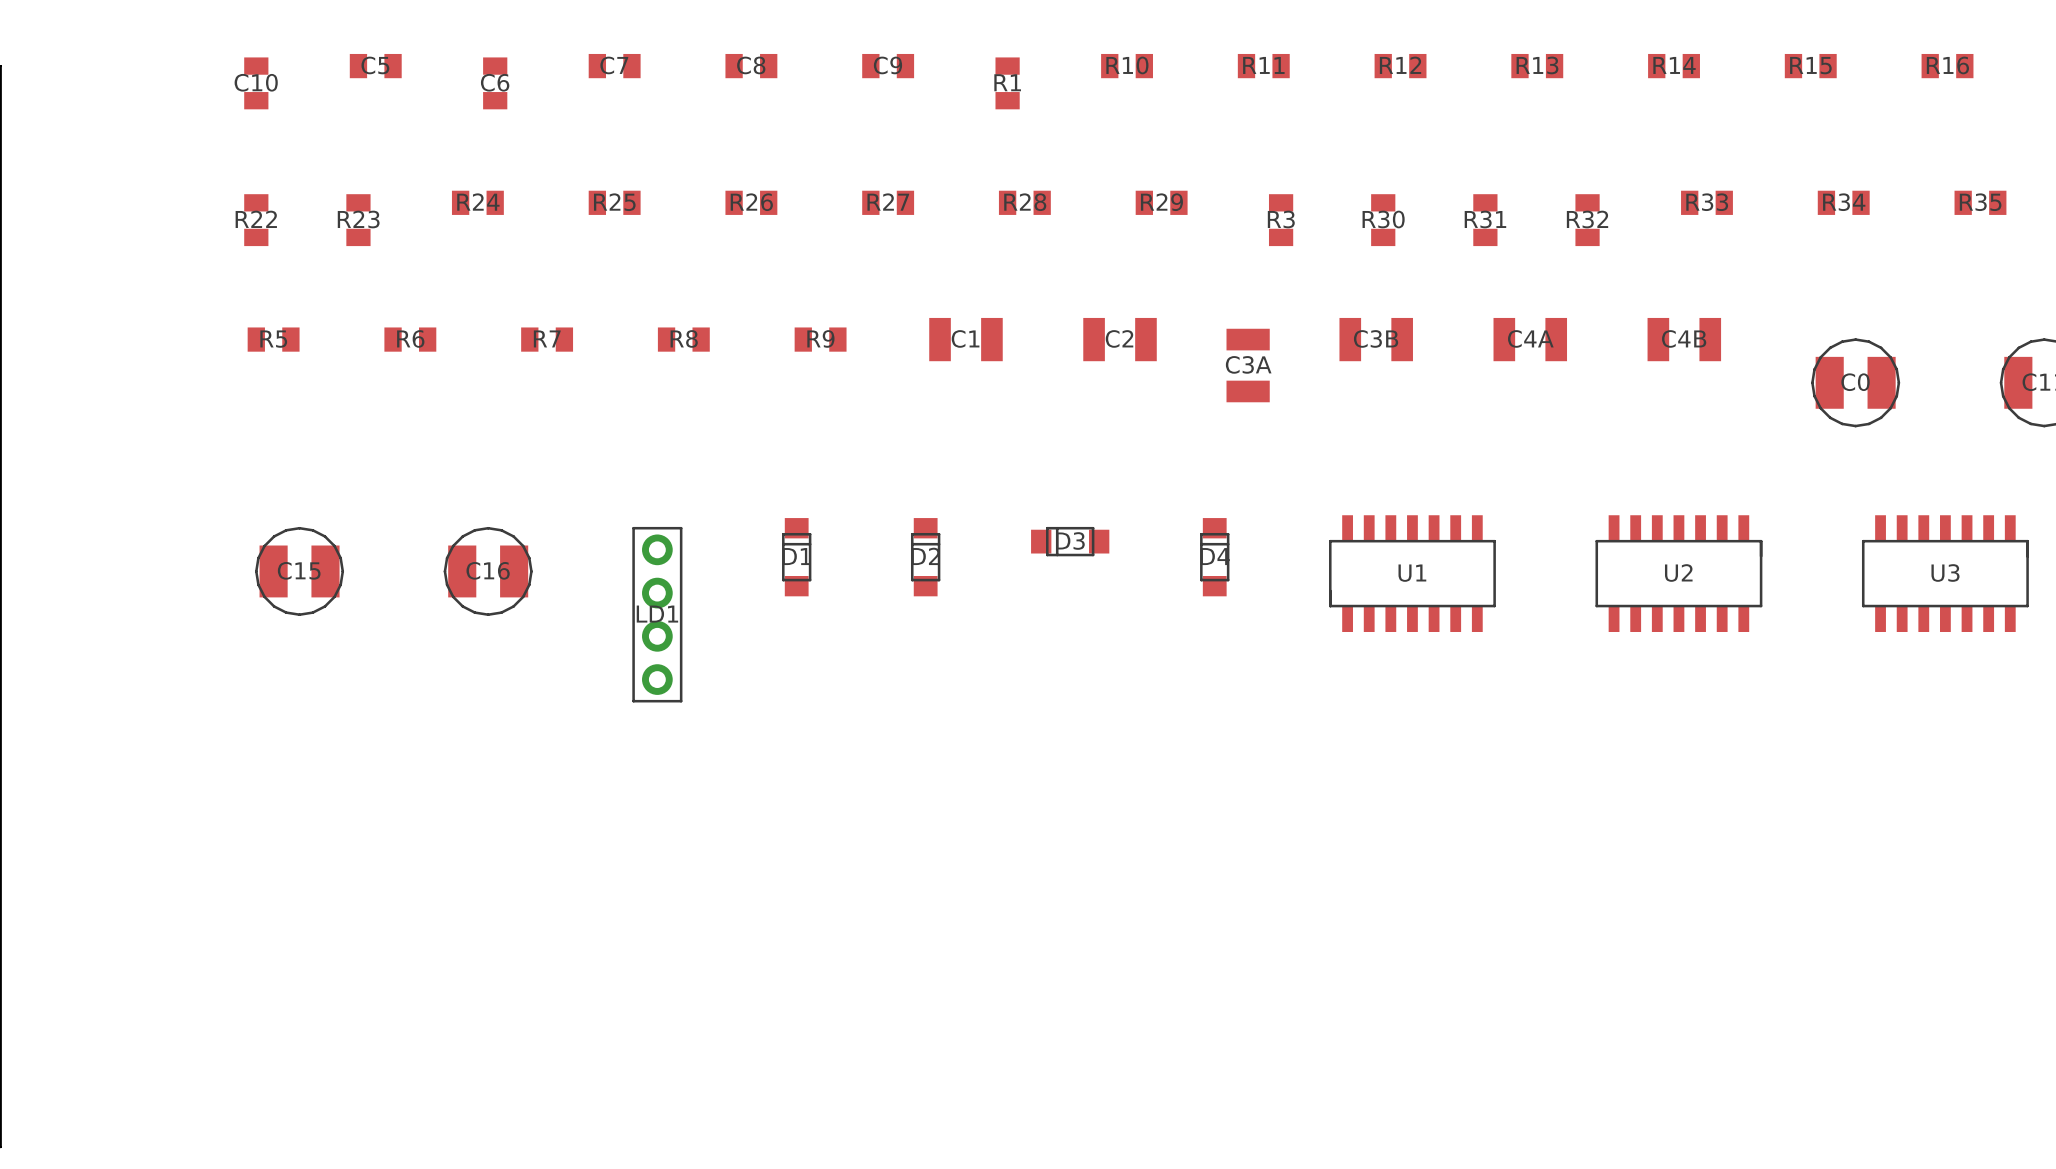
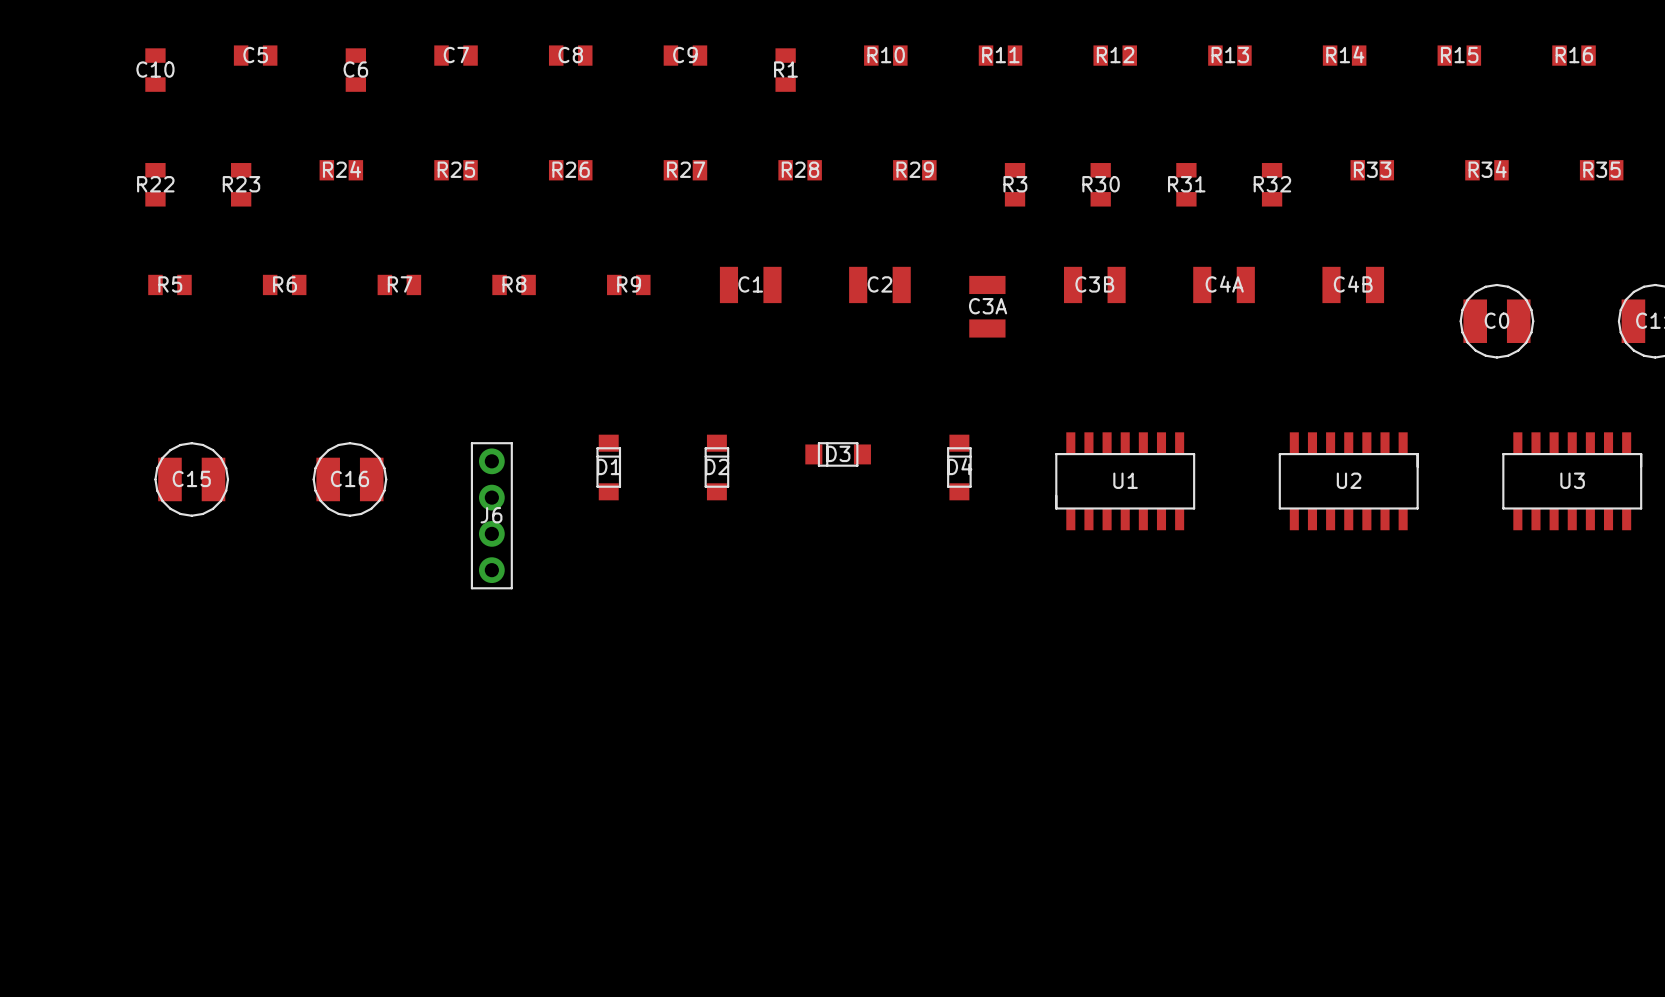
LD1 name: LD1 (657, 614) -> J6 (491, 515)

